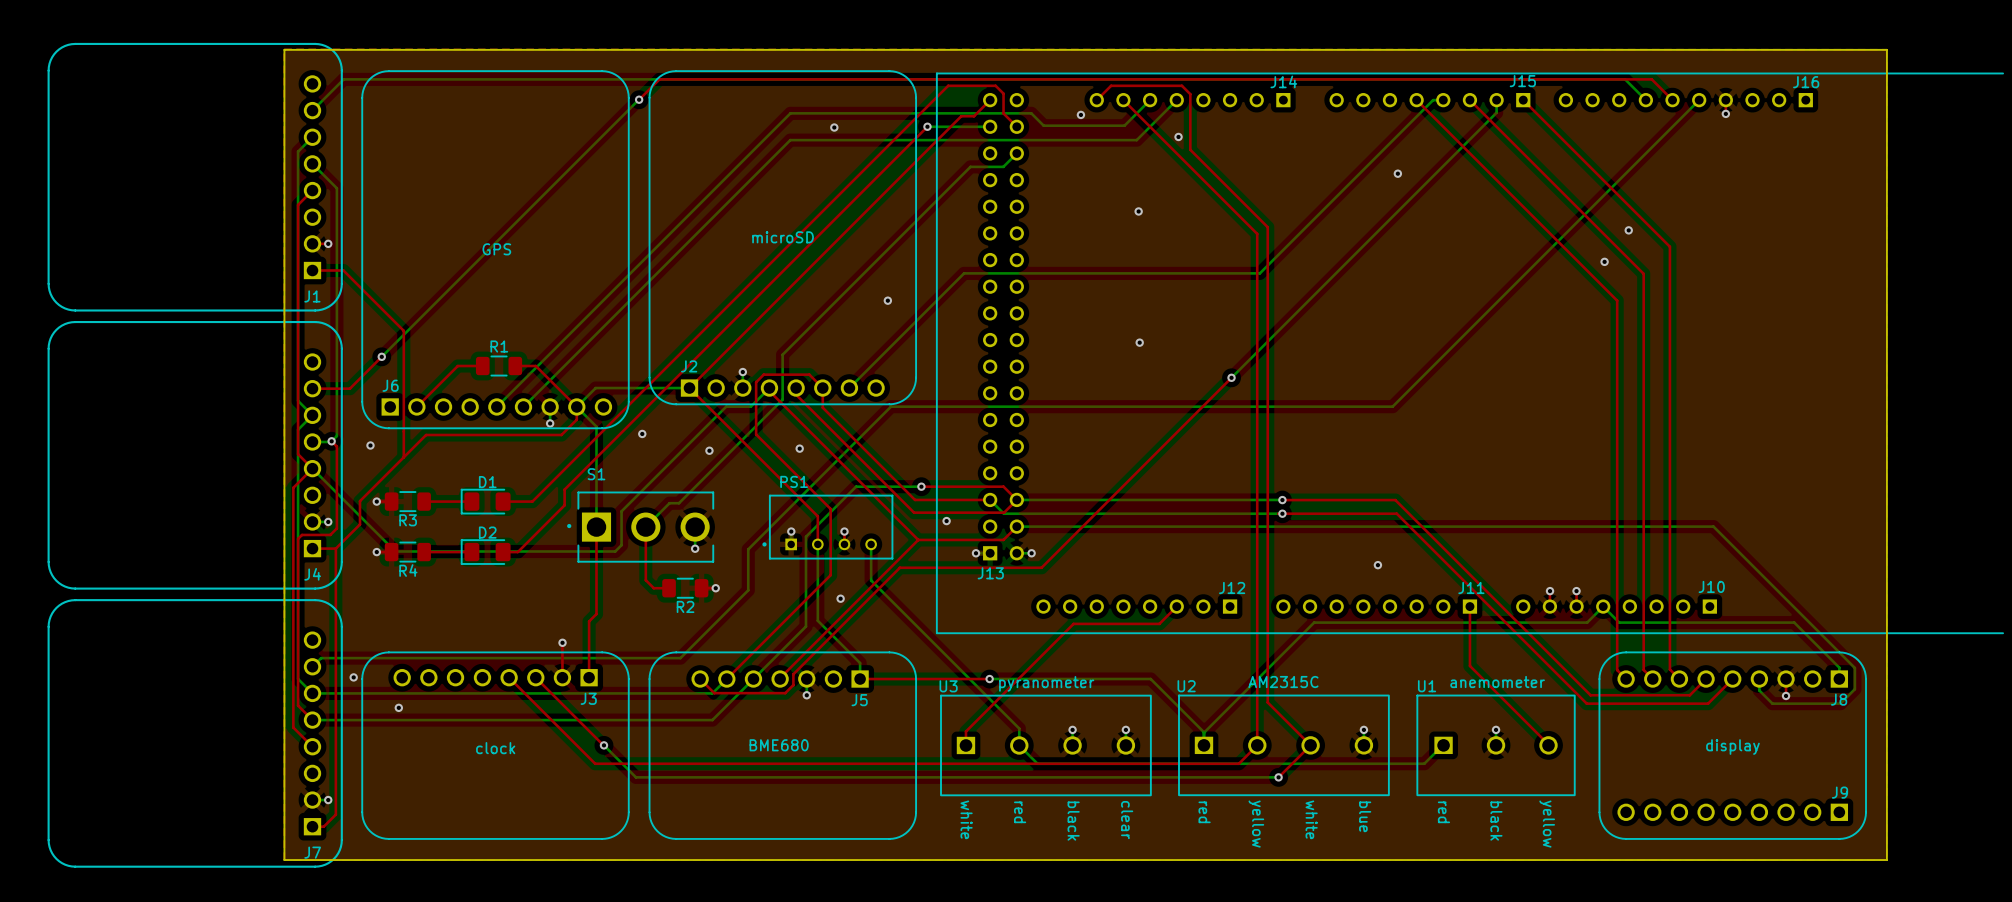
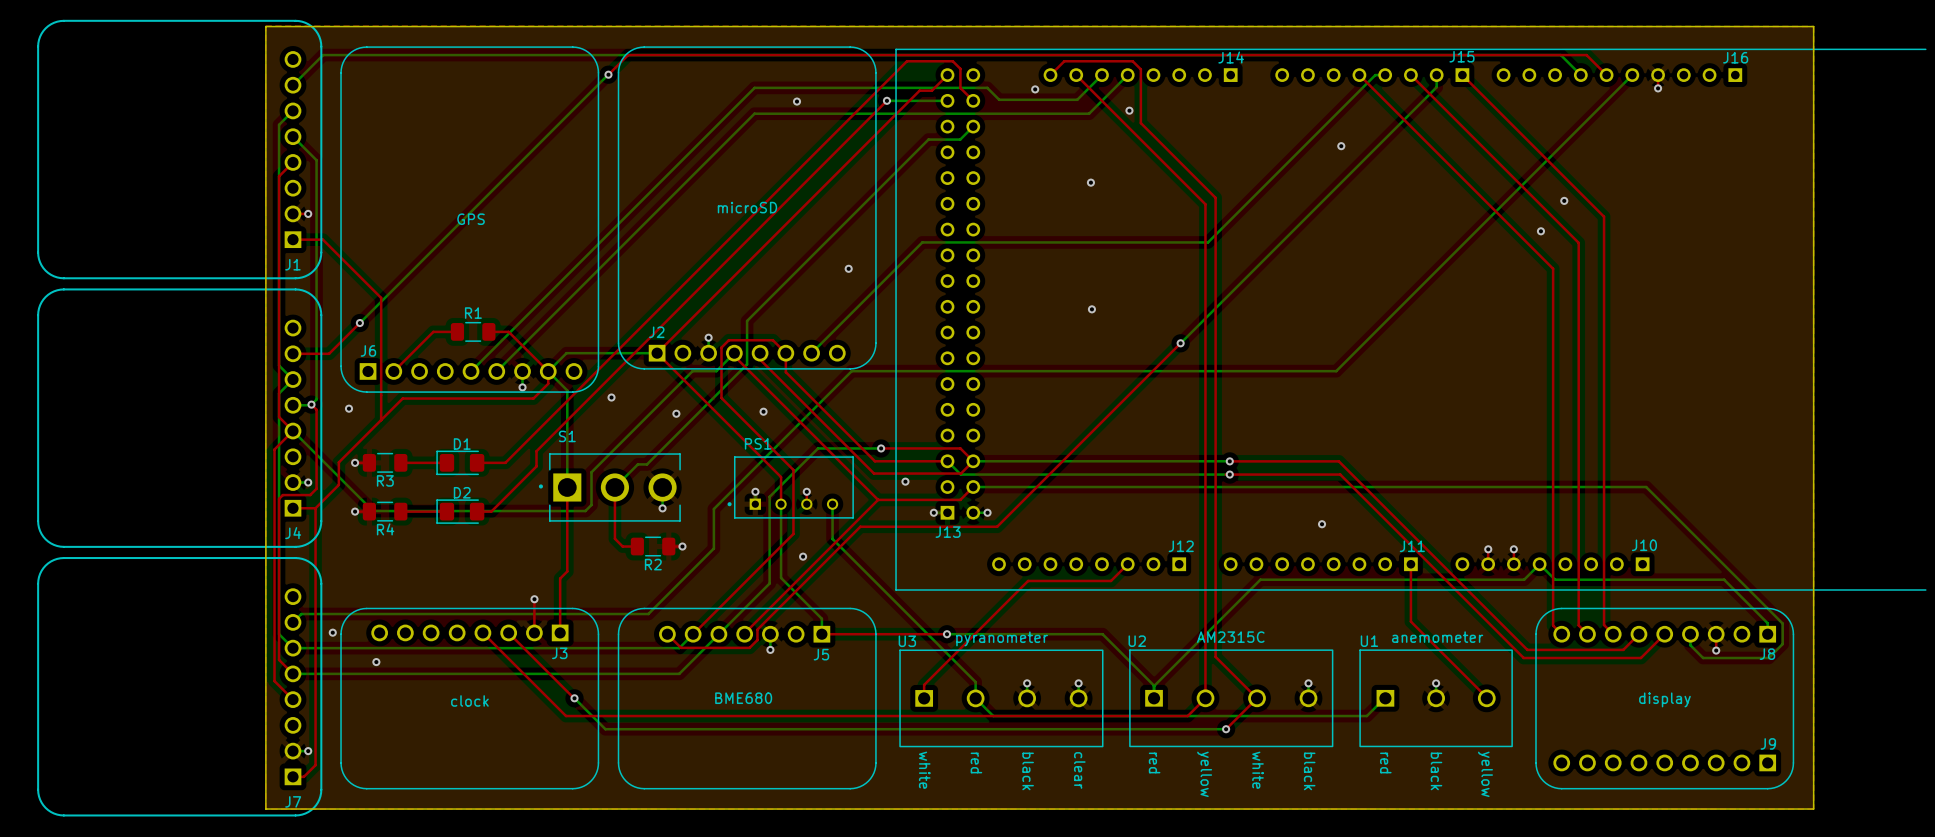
U2 footprint: [1178, 695, 1390, 796] -> [1129, 649, 1334, 747]

